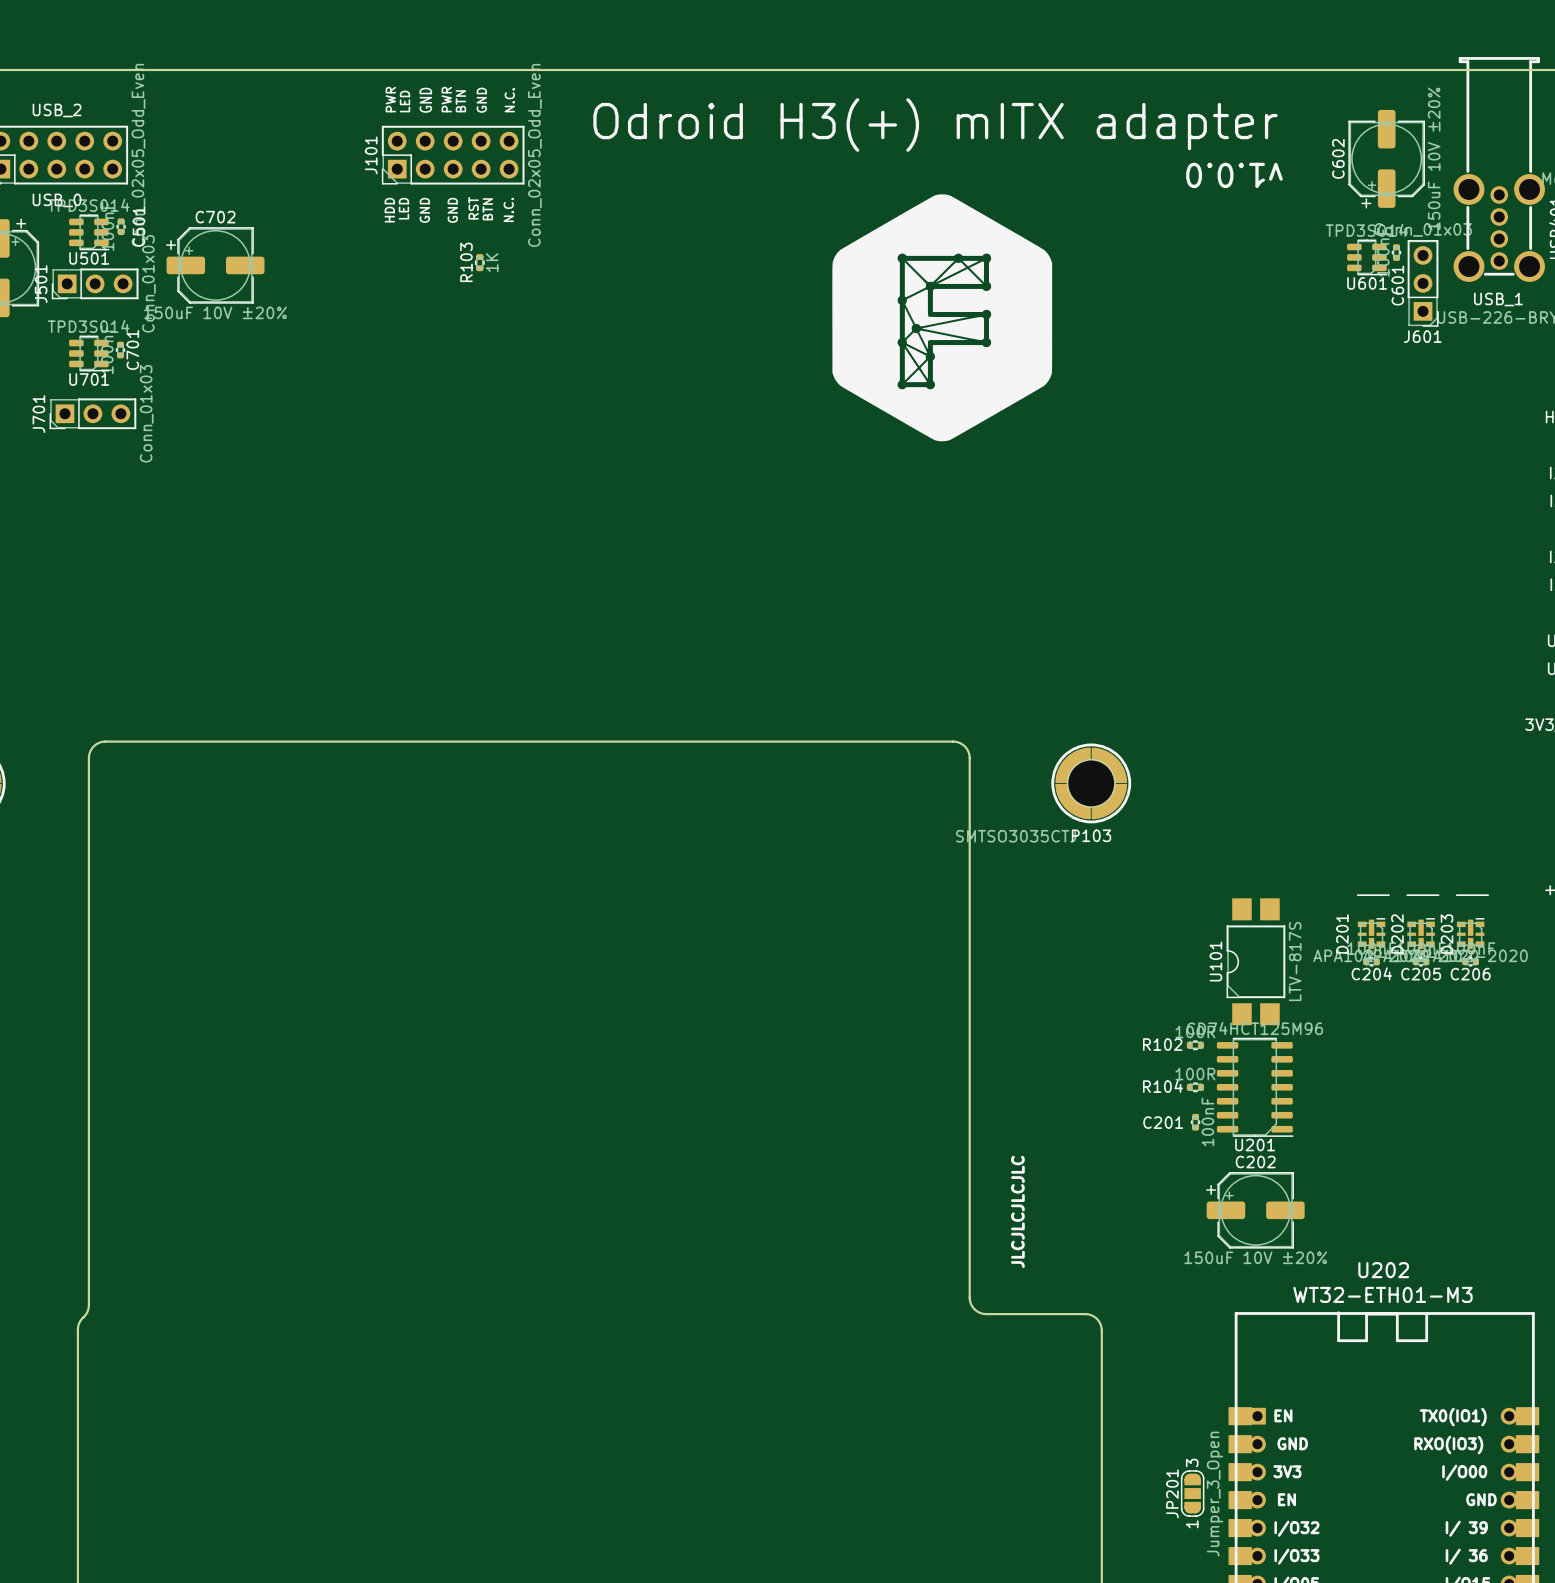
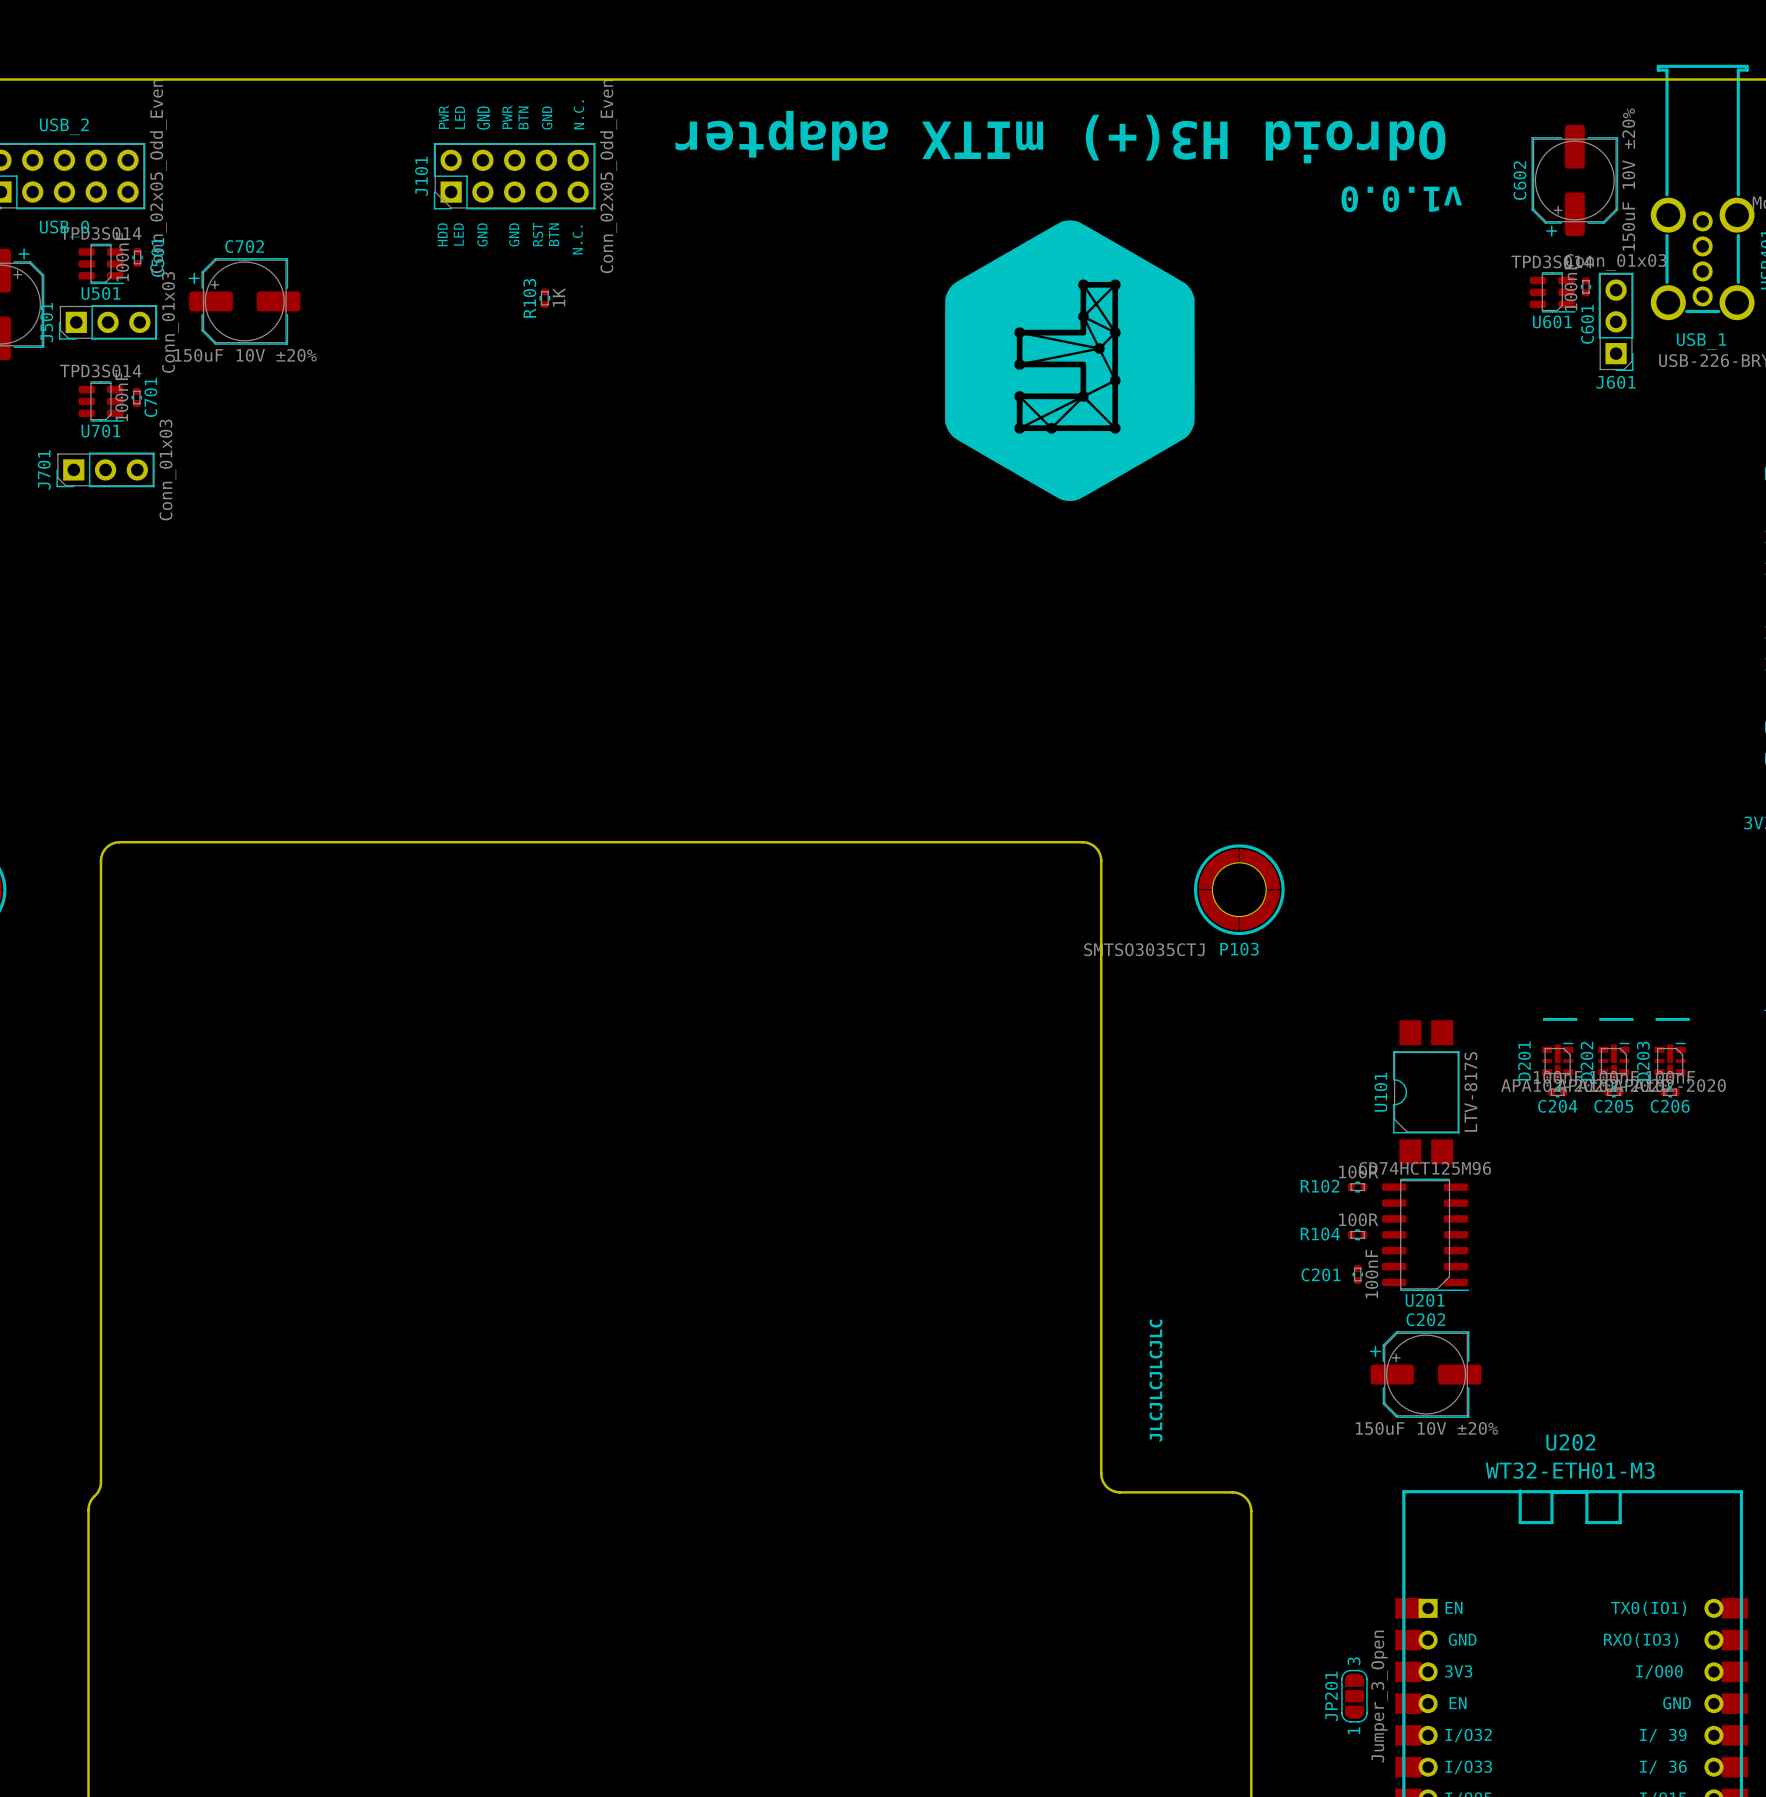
text rotation: 0° (935, 124) -> 180° (1060, 137)
drawing shape: [832, 194, 1053, 442] -> [945, 220, 1195, 501]

